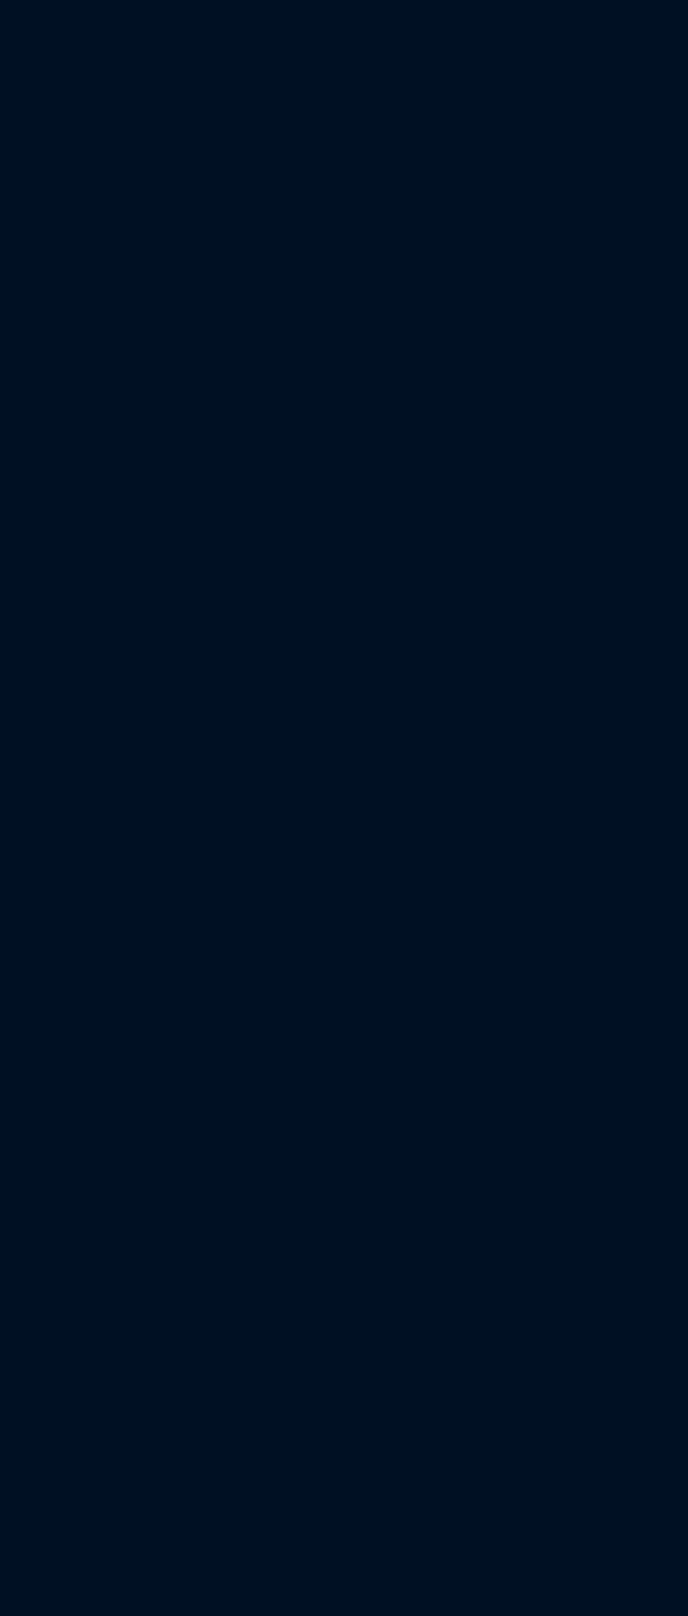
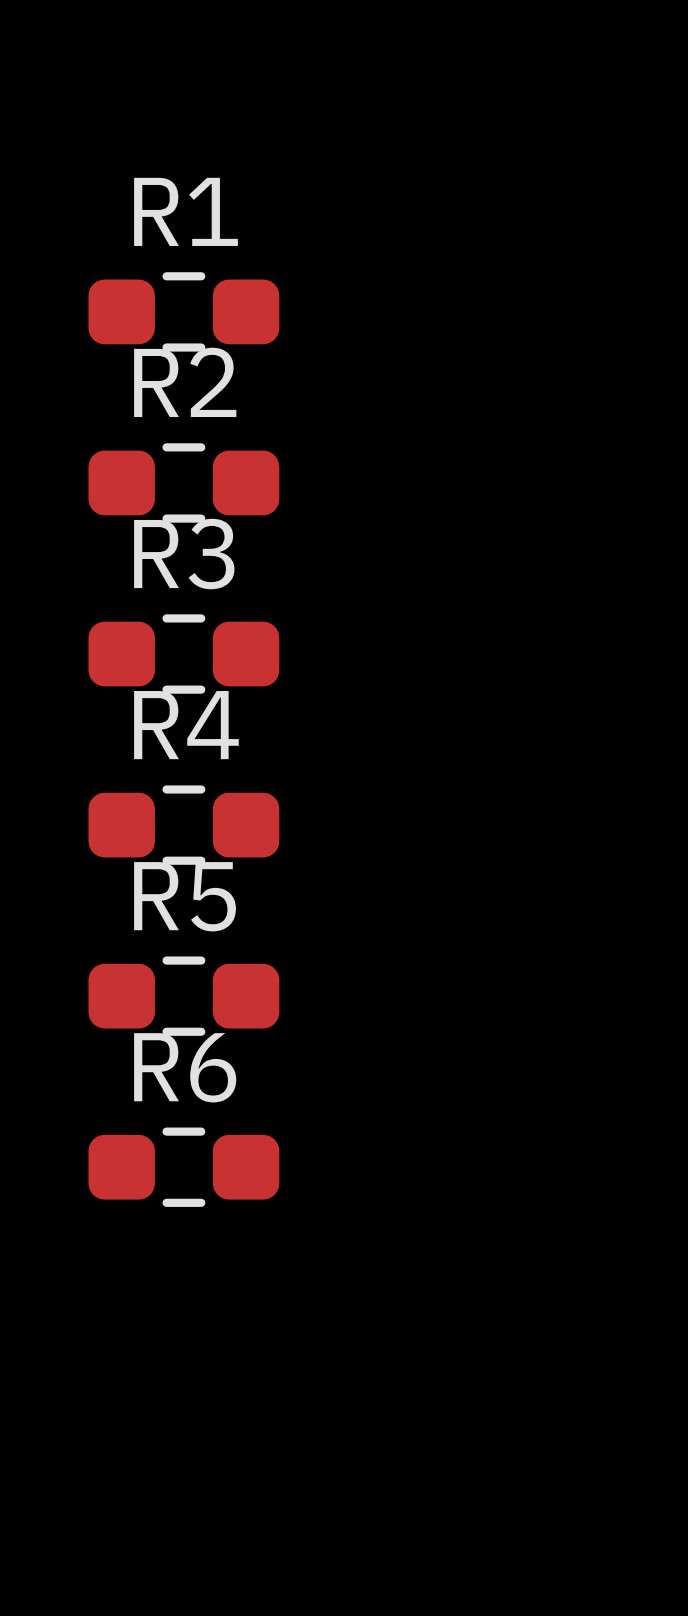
R1: none -> (183, 311)
R2: none -> (183, 482)
R3: none -> (183, 654)
R4: none -> (183, 825)
R5: none -> (183, 996)
R6: none -> (183, 1167)

